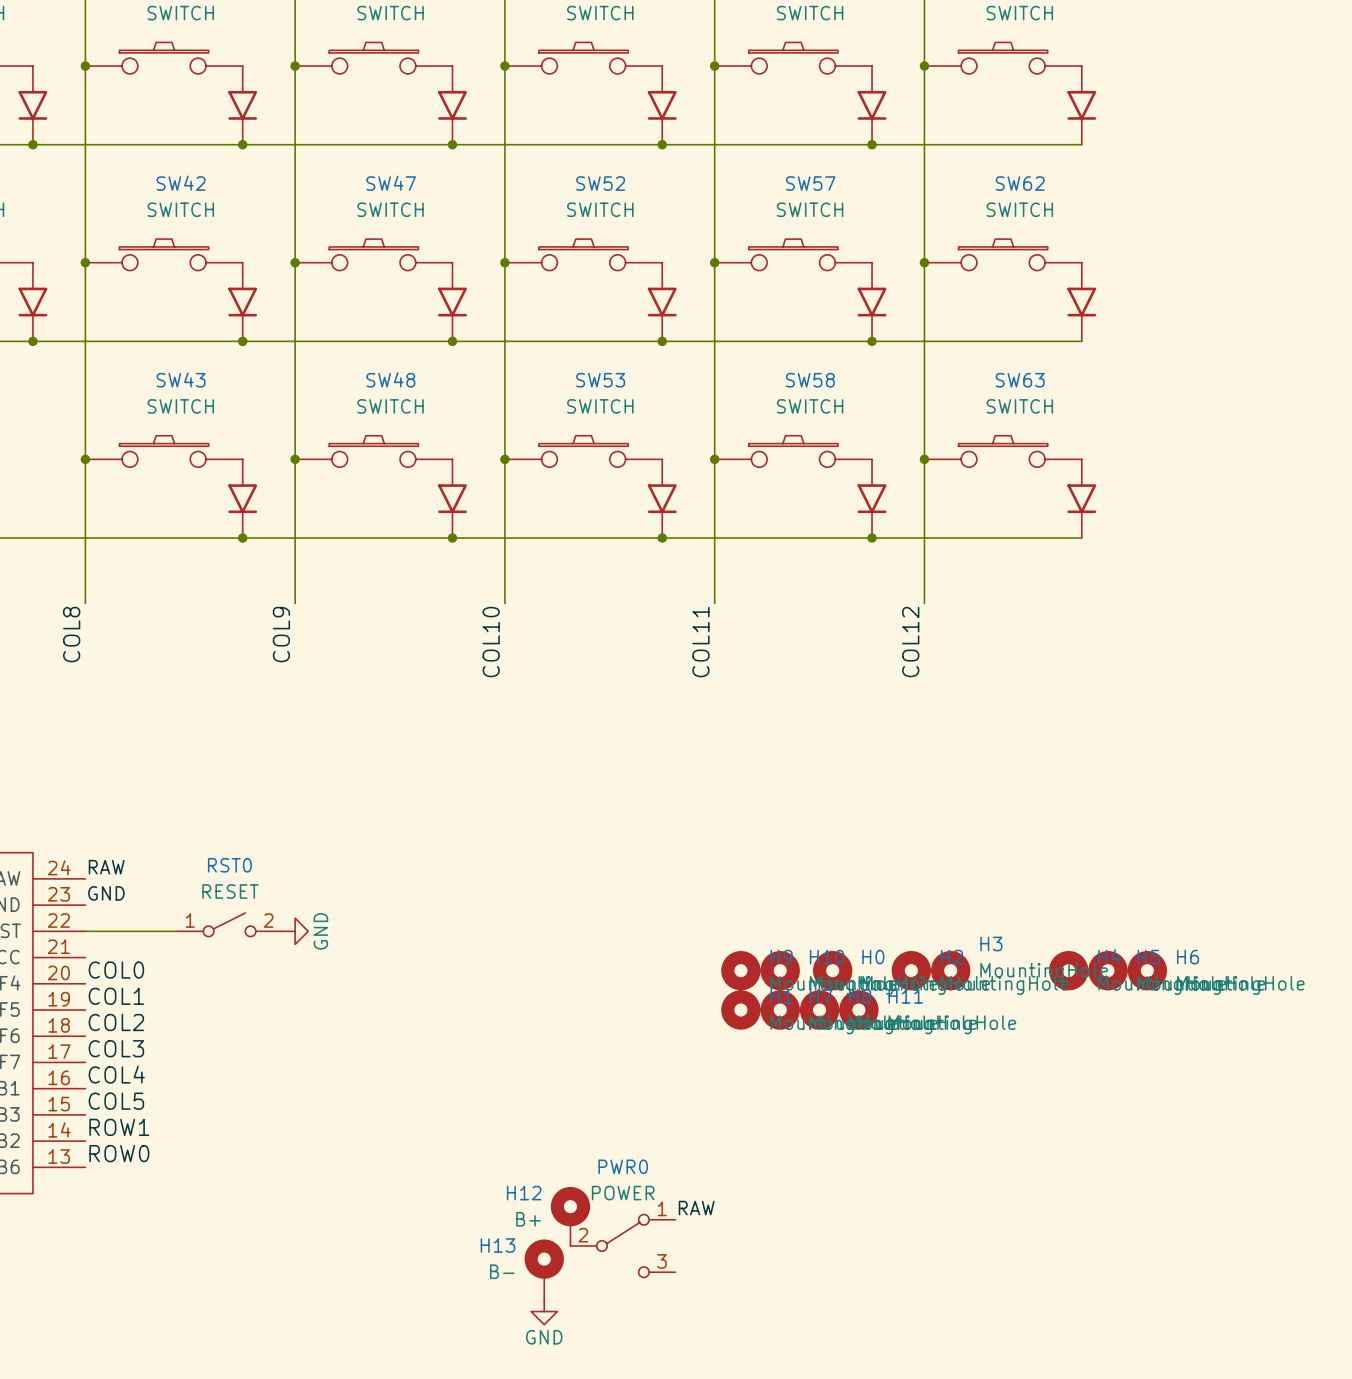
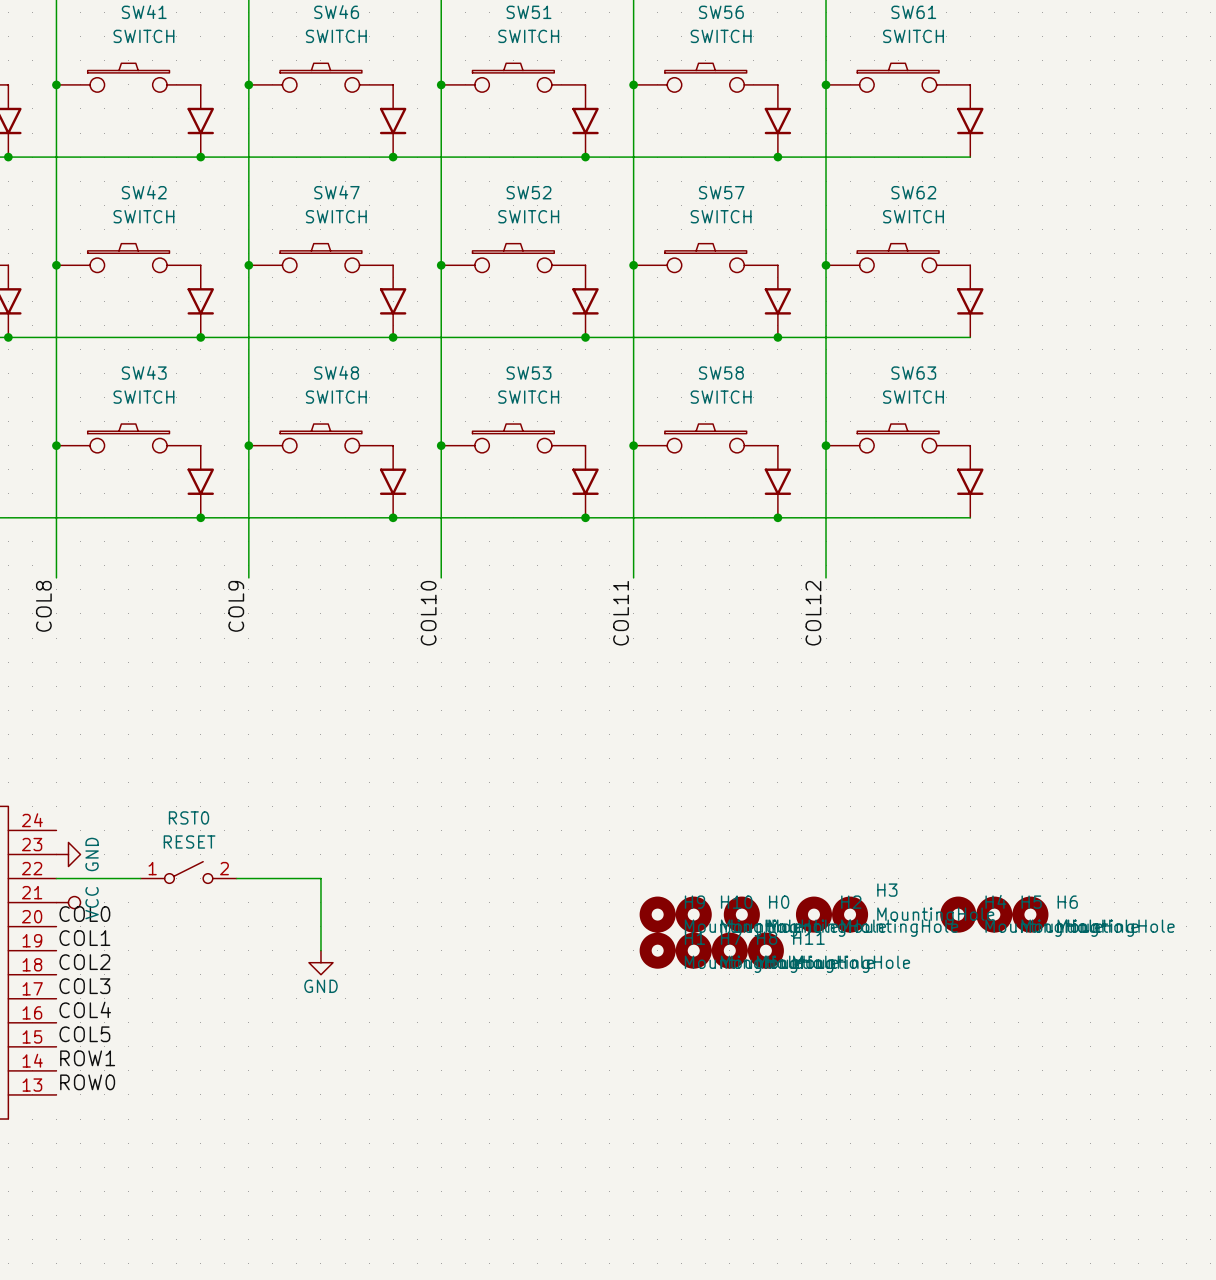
label: RAW (106, 867) -> none
label: GND (106, 893) -> none
power symbol: none -> GND (68, 854)
wire: none -> (236, 878) (320, 878) (320, 950)
power symbol: GND (295, 931) -> none
power symbol: none -> VCC (68, 902)
power symbol: none -> GND (320, 962)
label: RAW (696, 1208) -> none
H12: B+ (570, 1216) -> none
PWR0: POWER (622, 1246) -> none
H13: B- (544, 1268) -> none
power symbol: GND (544, 1311) -> none

